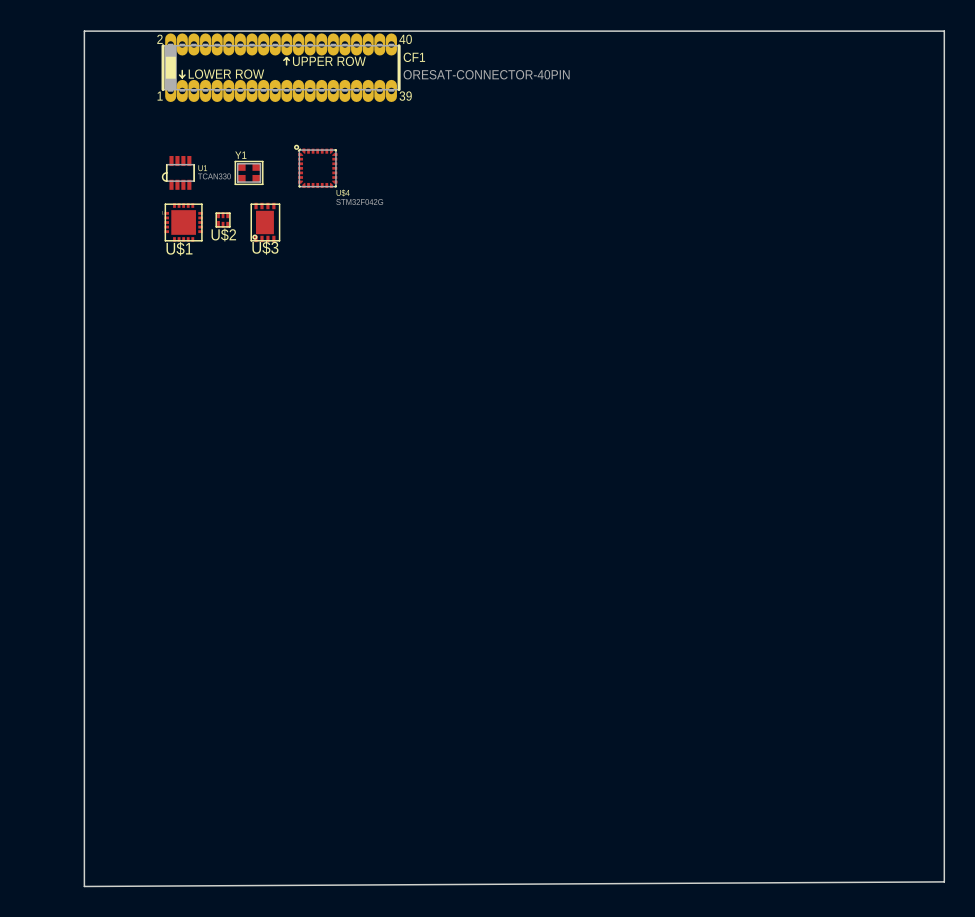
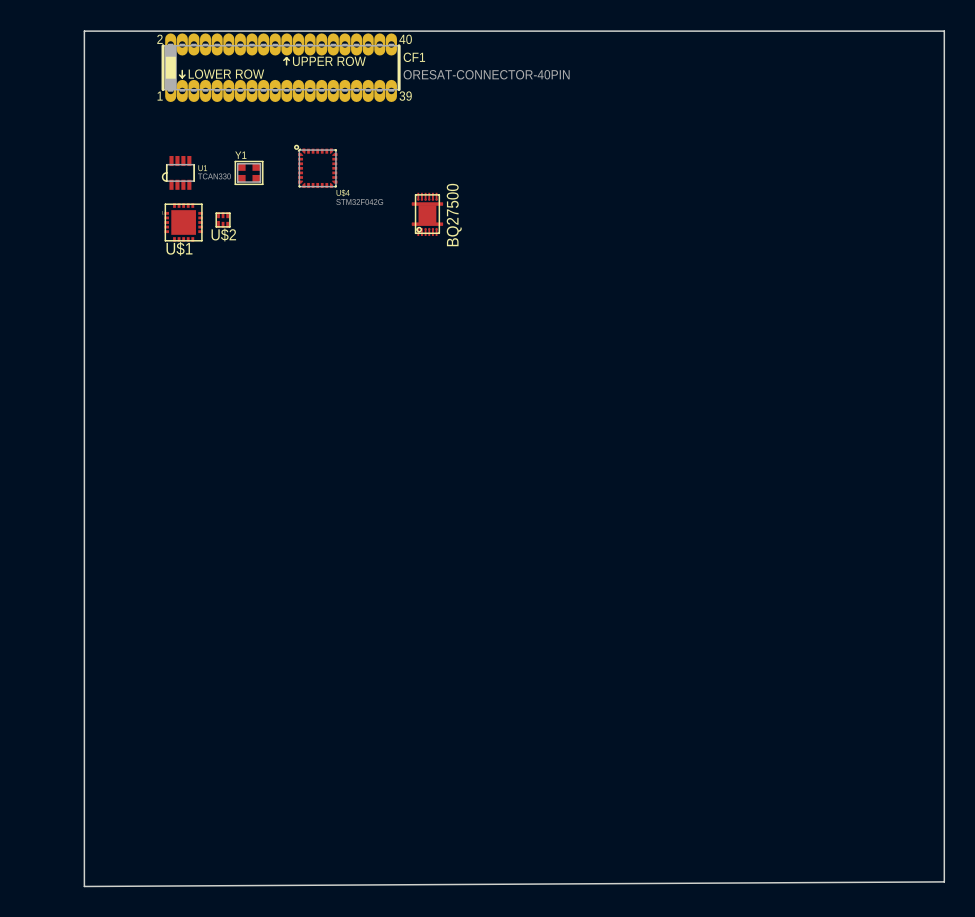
part: none -> (427, 214)
U$3: (265, 222) -> none

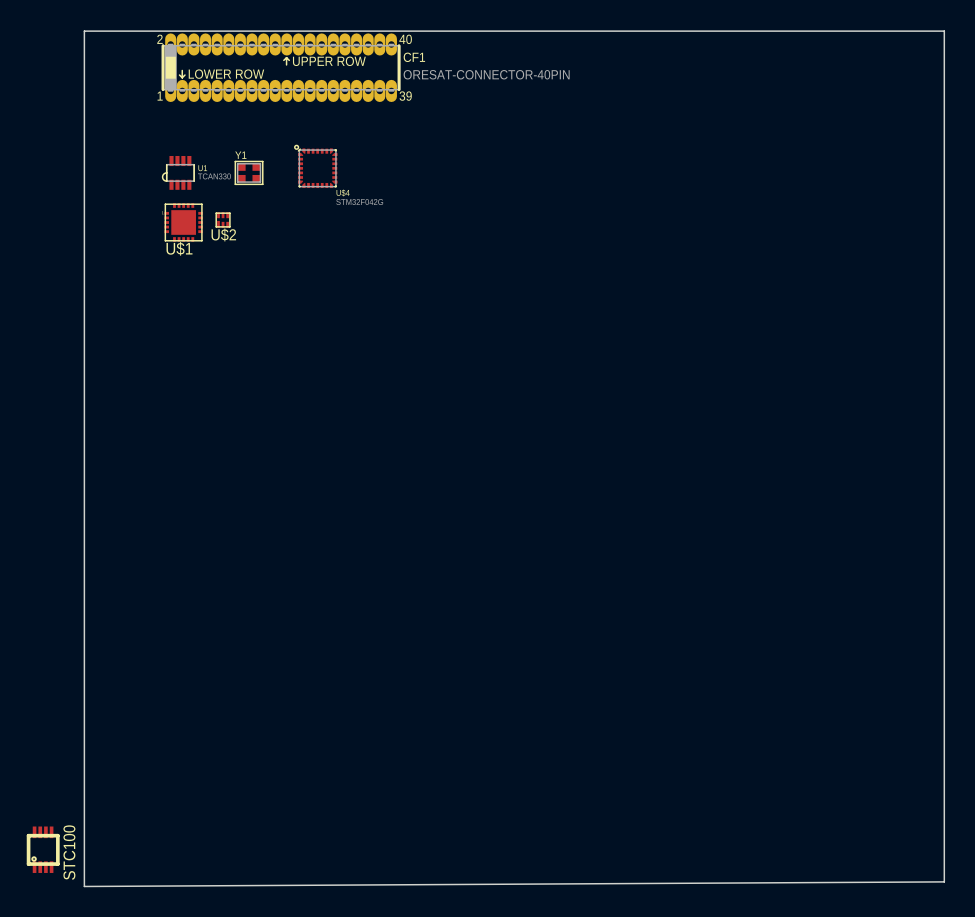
part: (427, 214) -> none
part: none -> (43, 849)

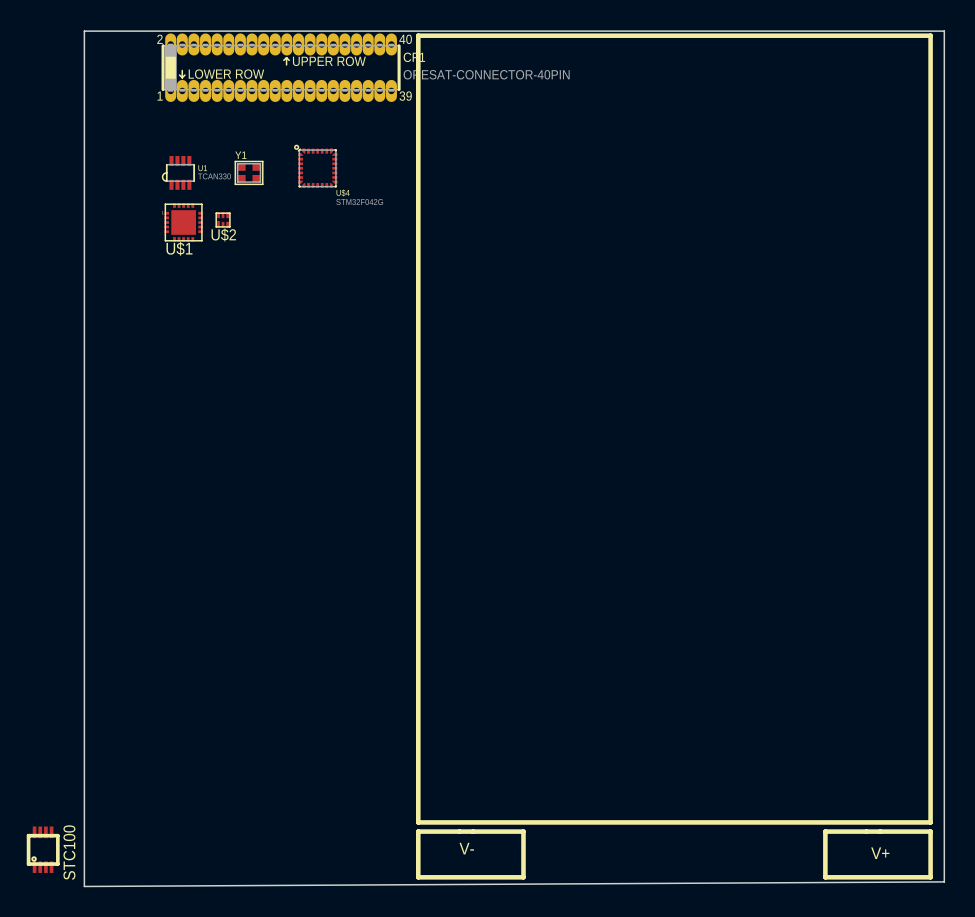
drawing: none -> [416, 33, 933, 880]

